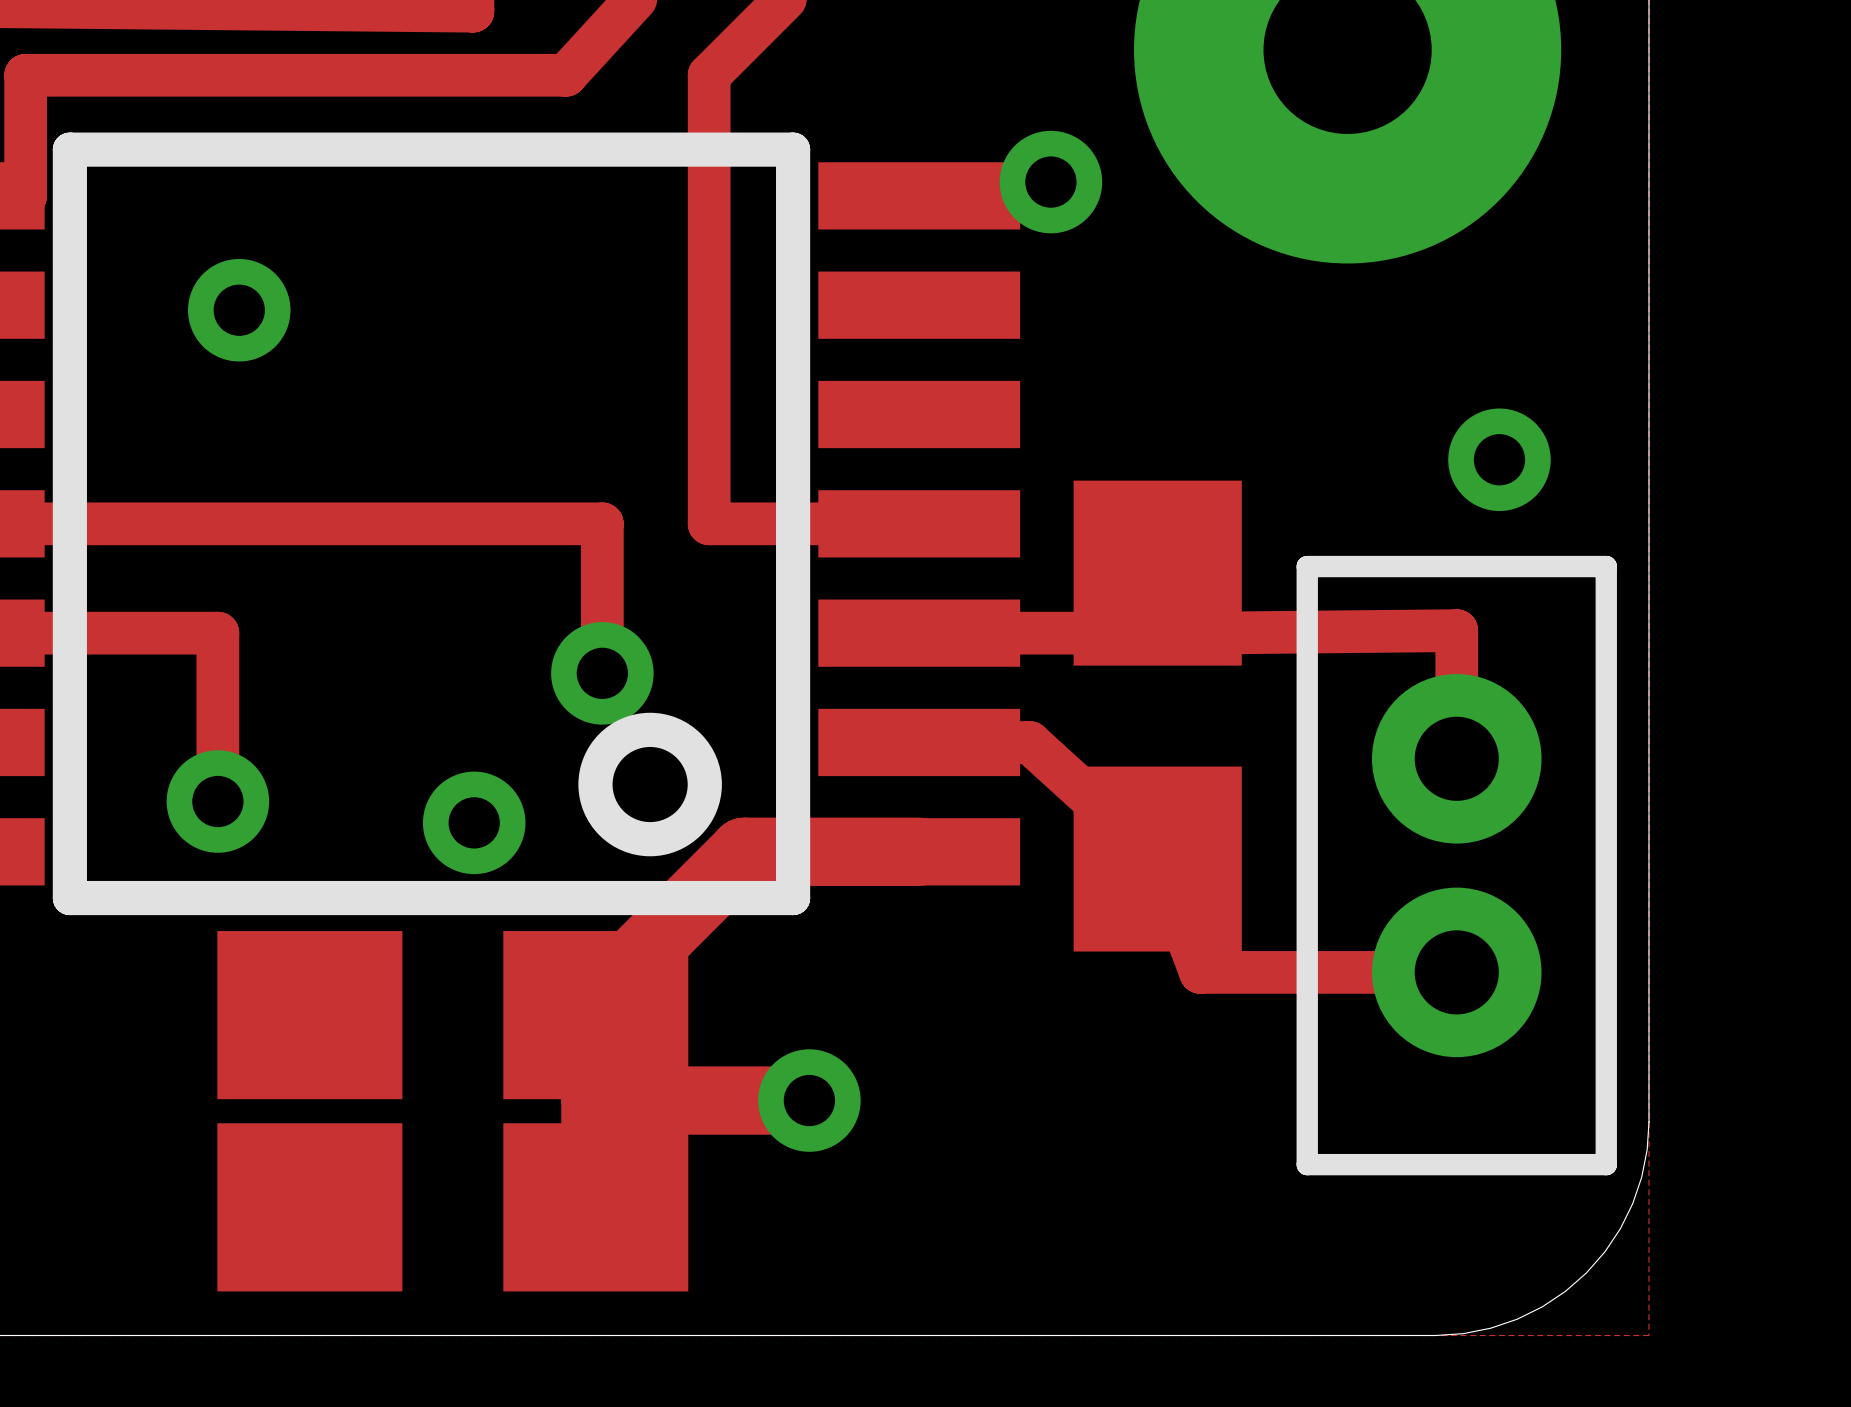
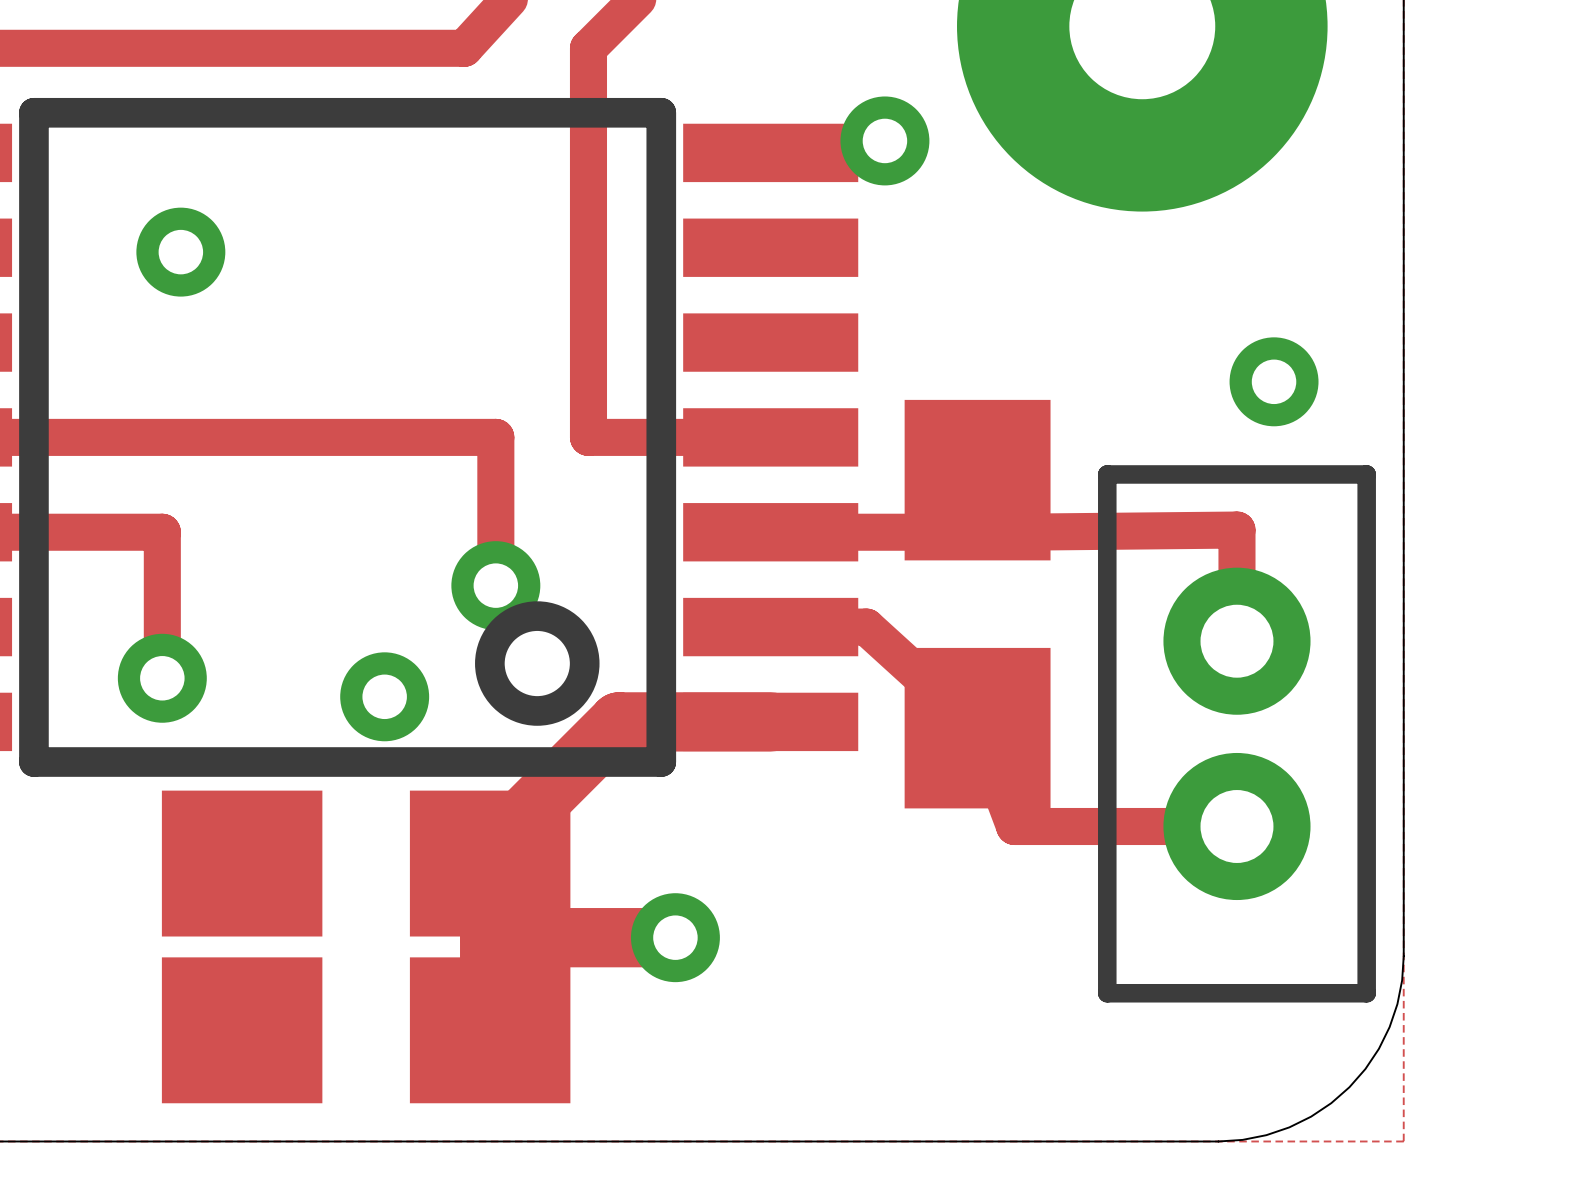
via position: (602, 673) -> (495, 585)

